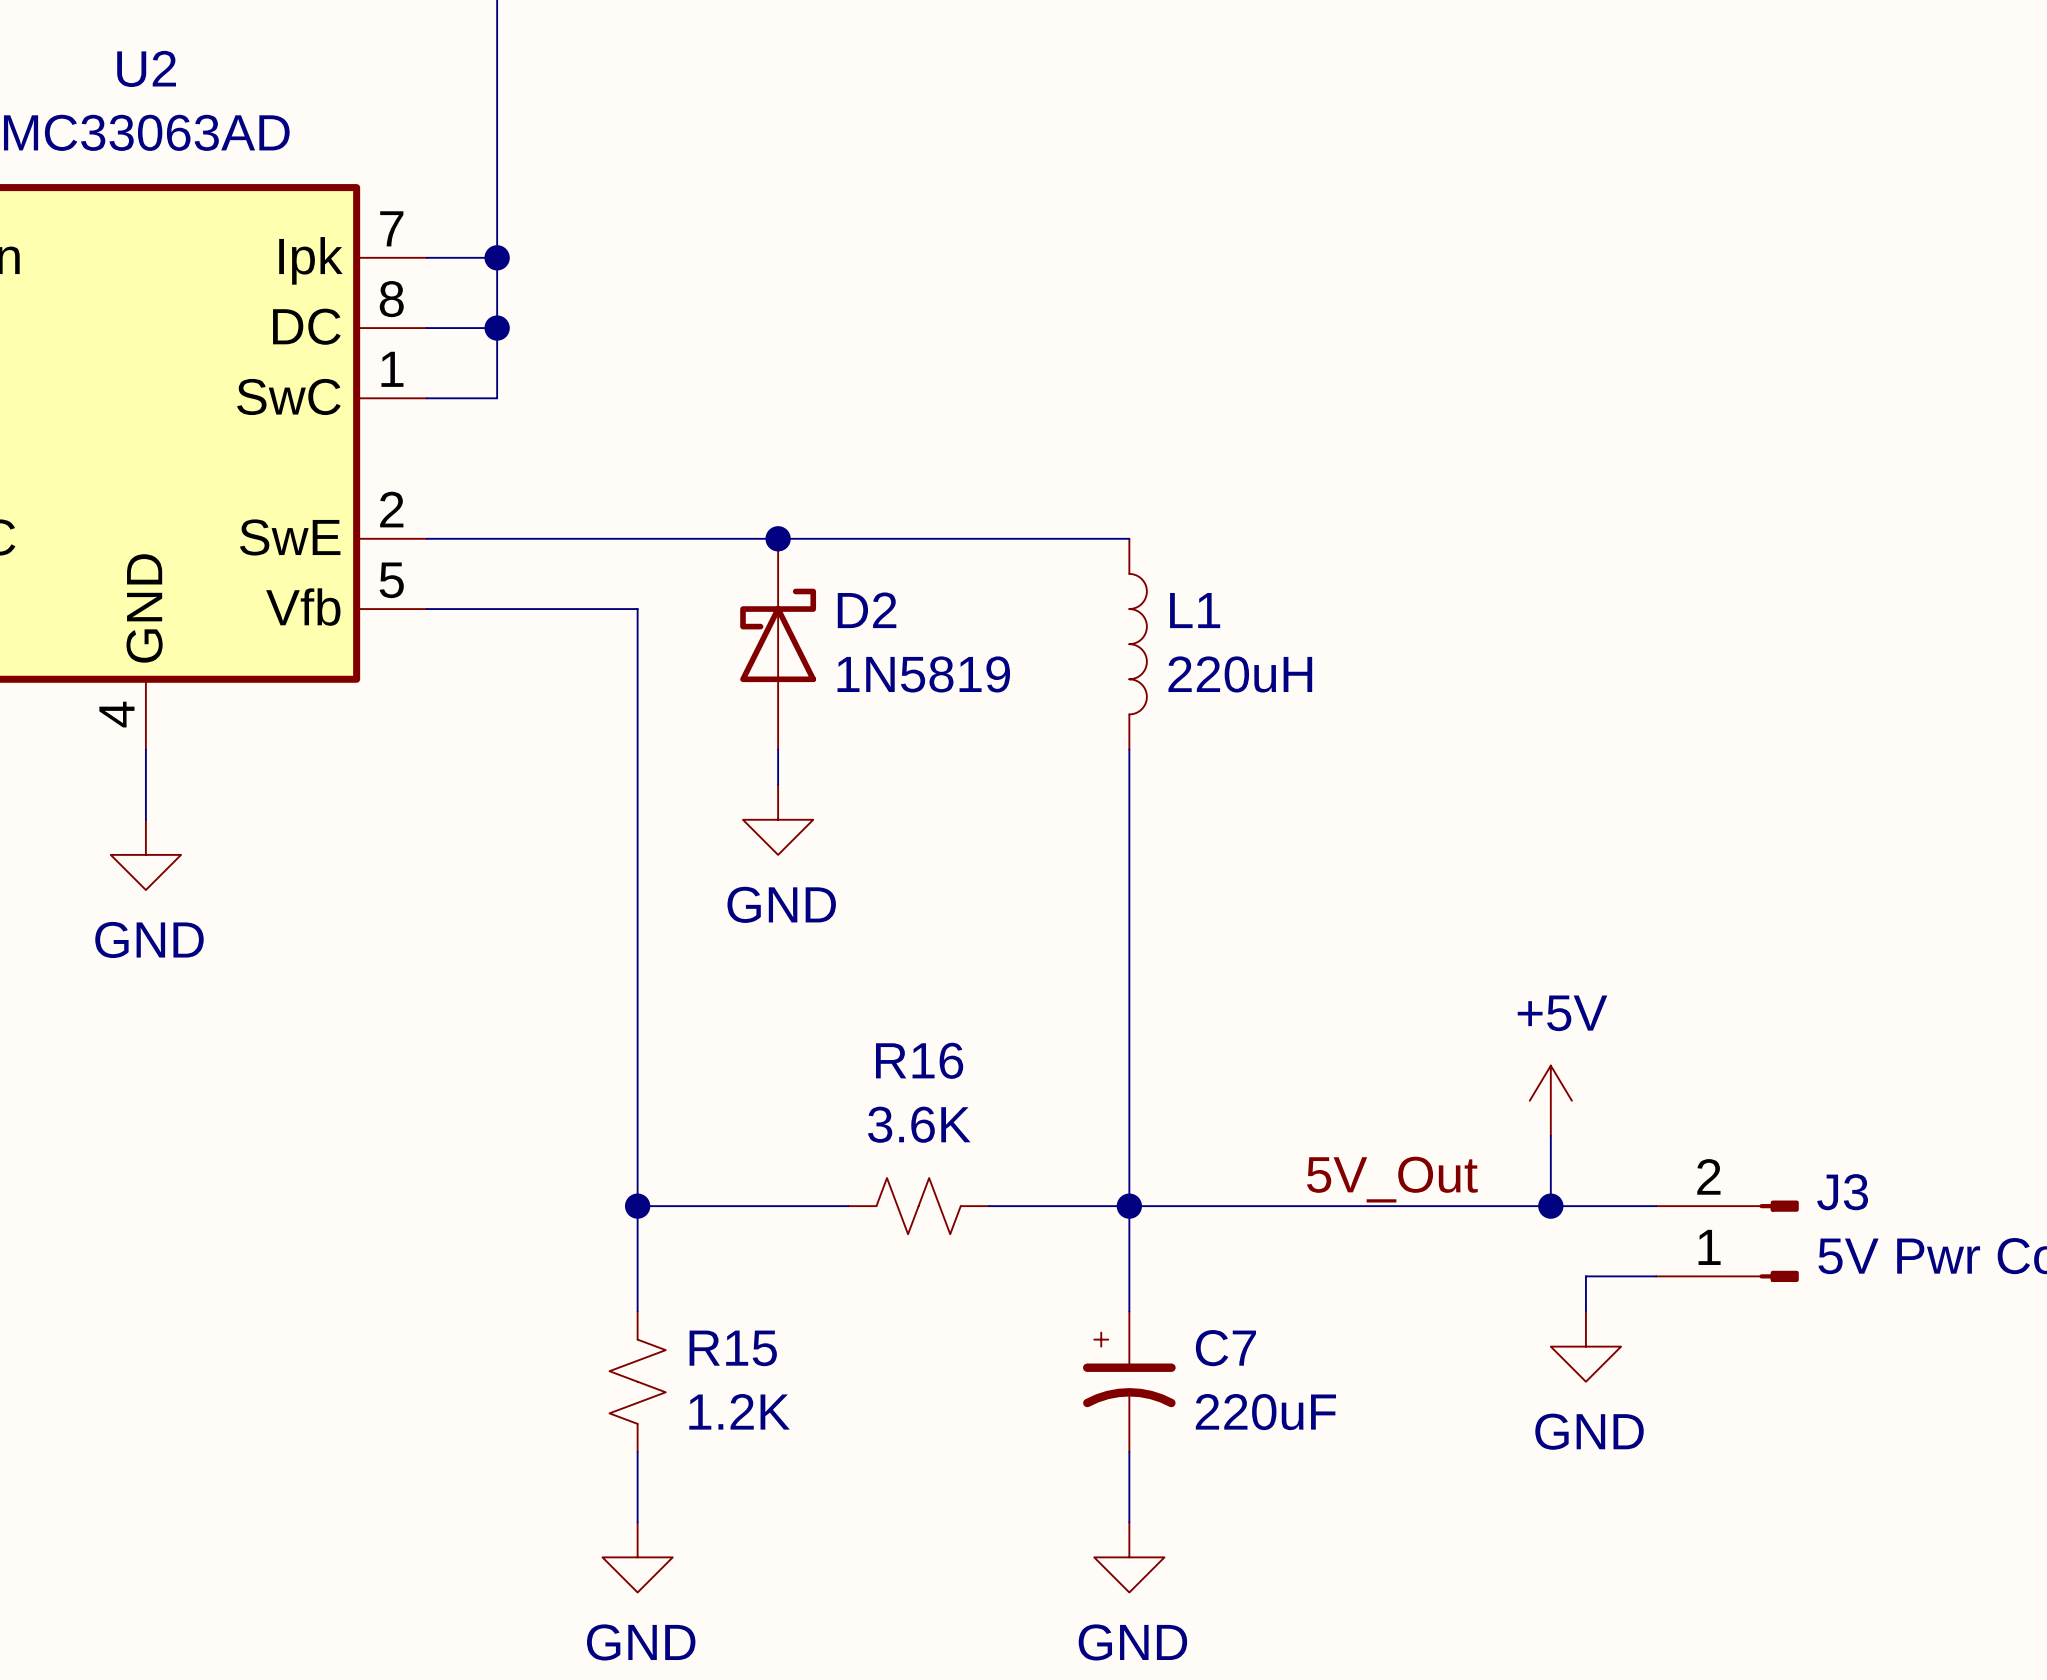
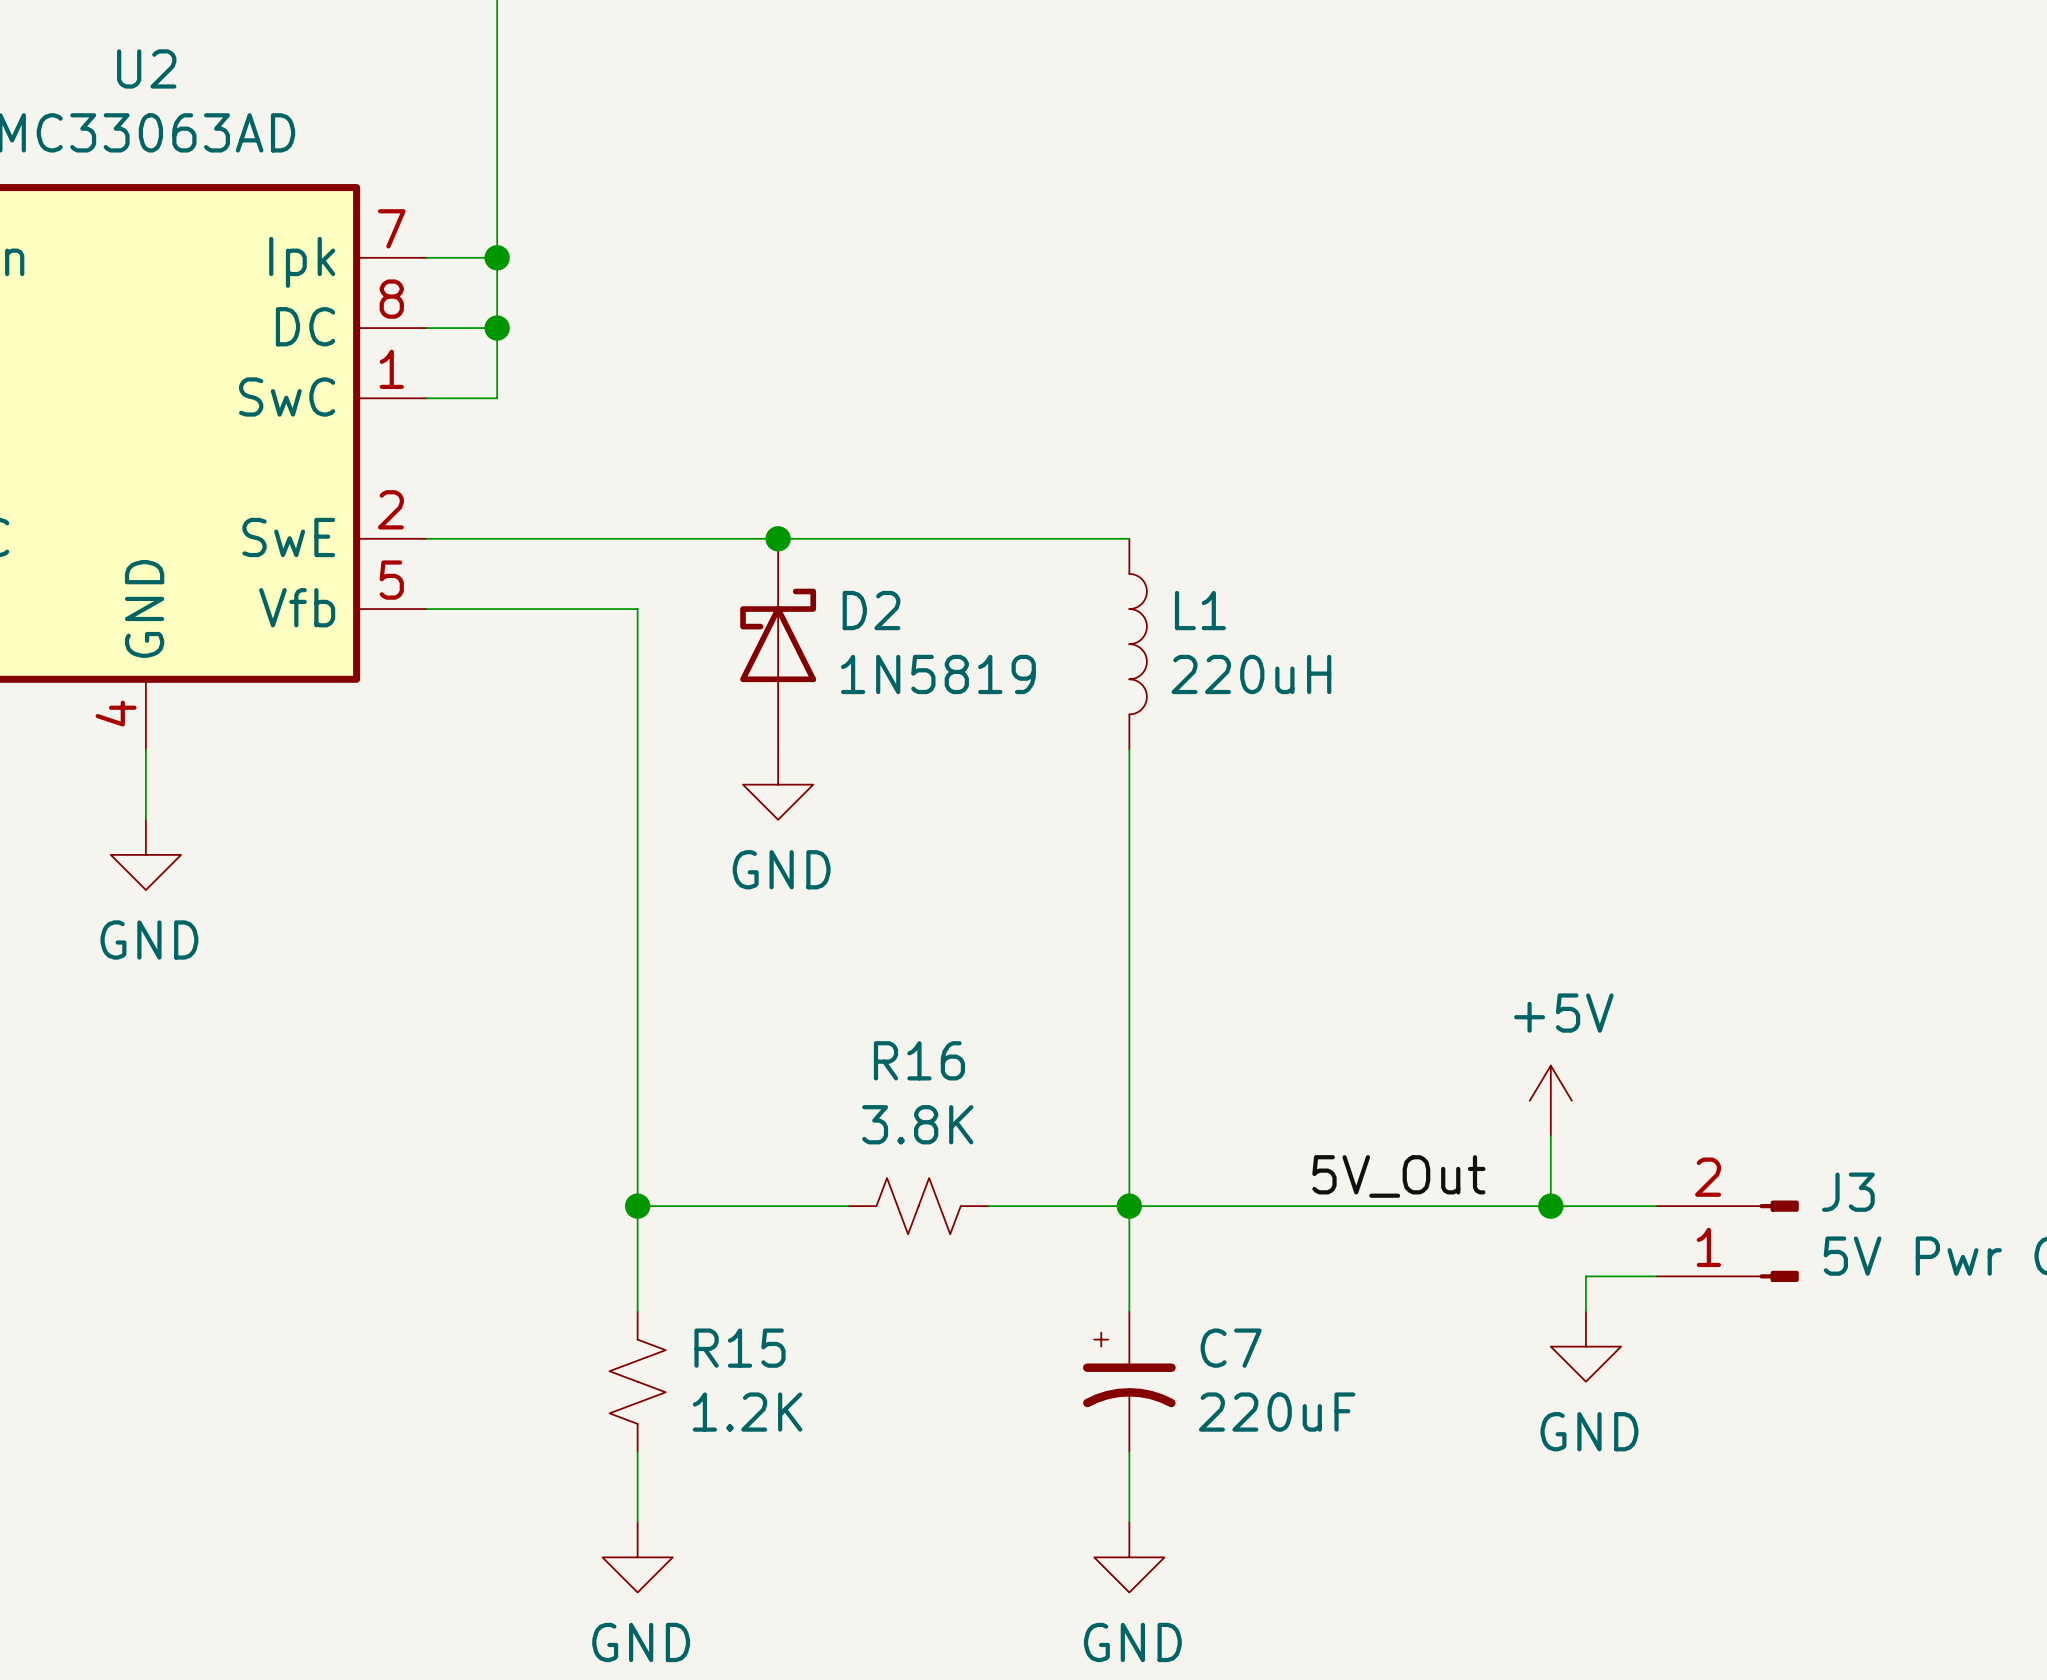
power symbol position: GND (778, 819) -> GND (778, 784)
R16 value: 3.6K (919, 1124) -> 3.8K (917, 1124)

